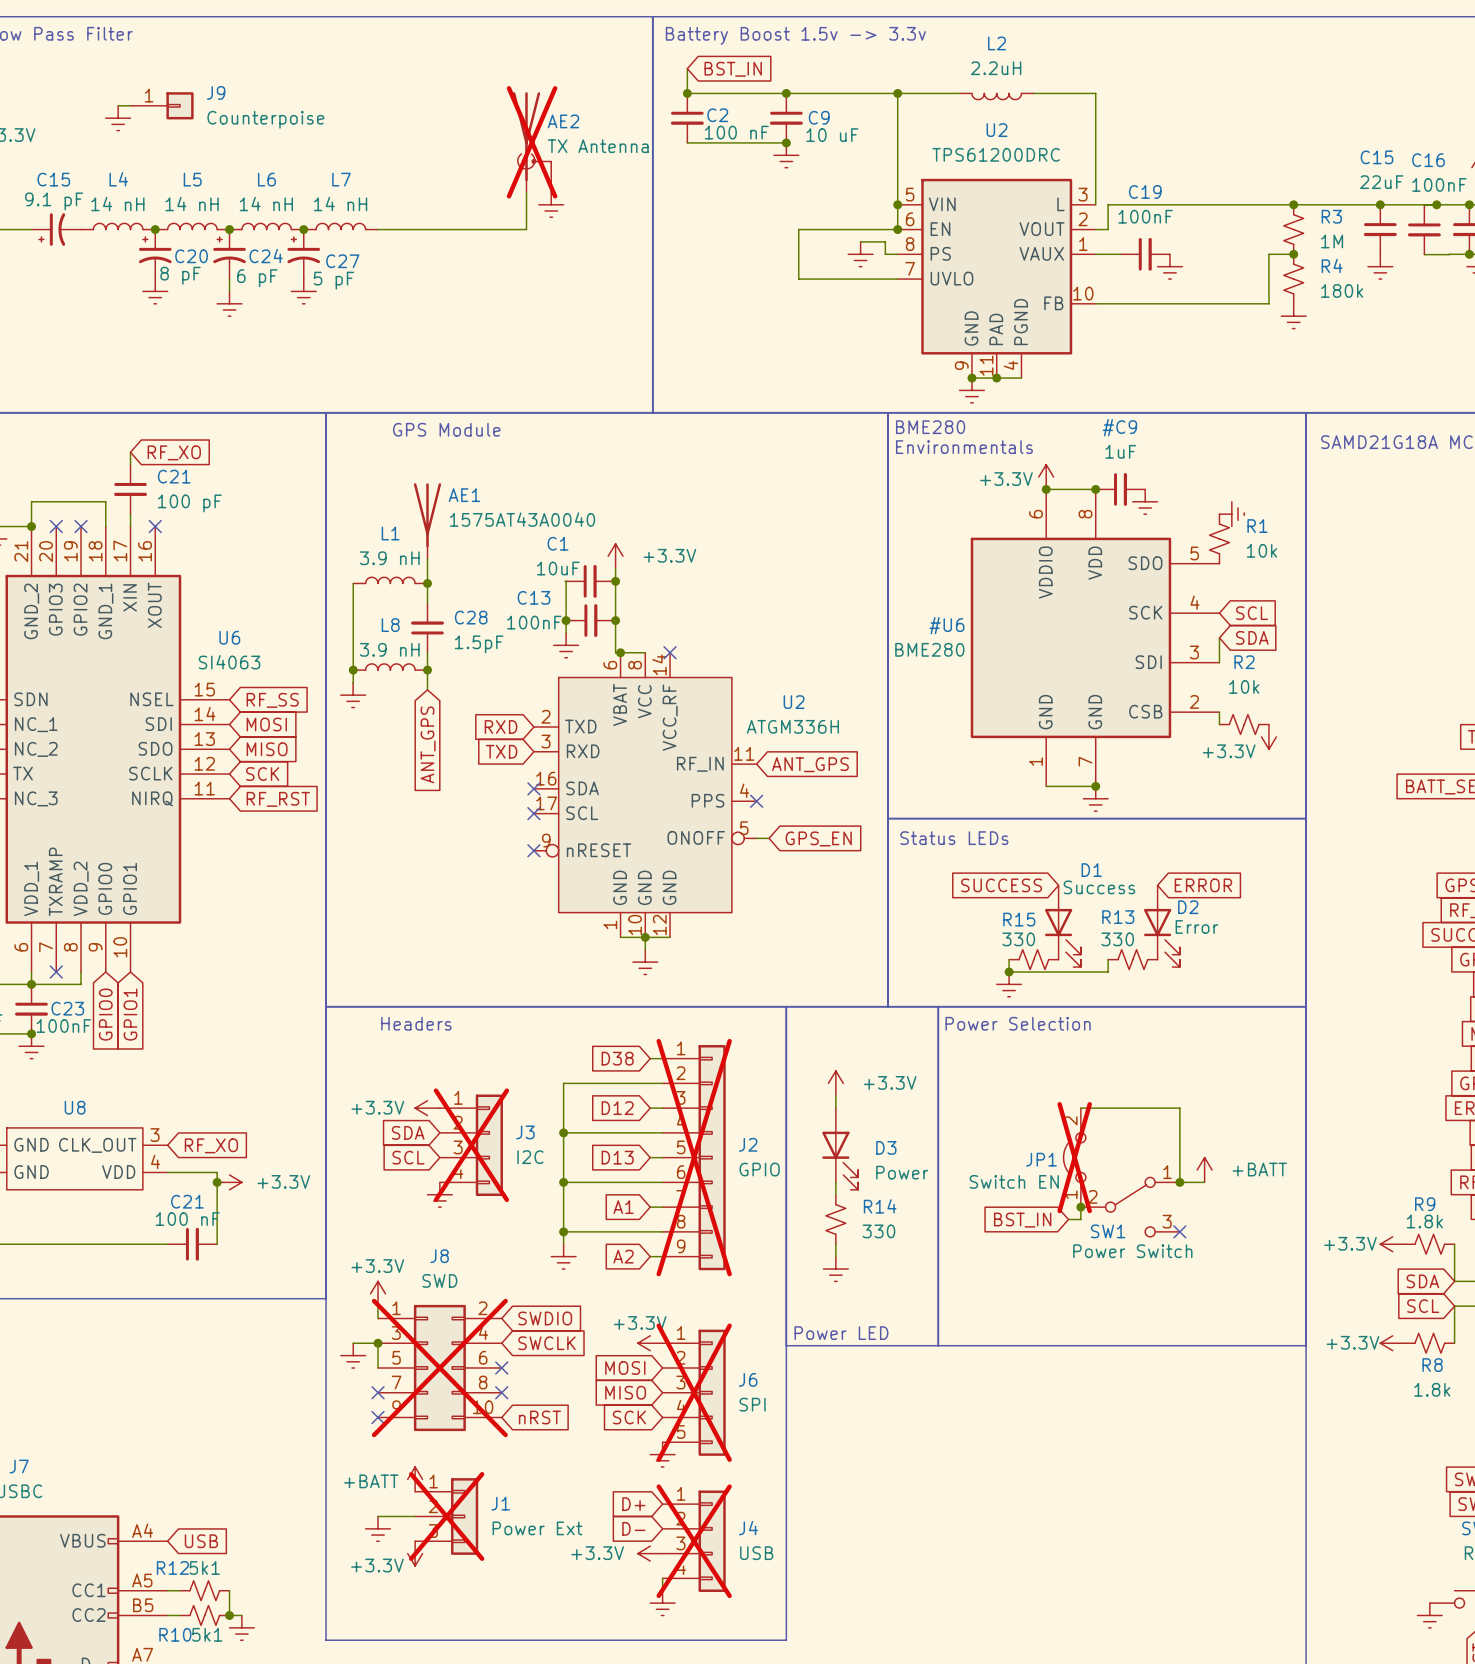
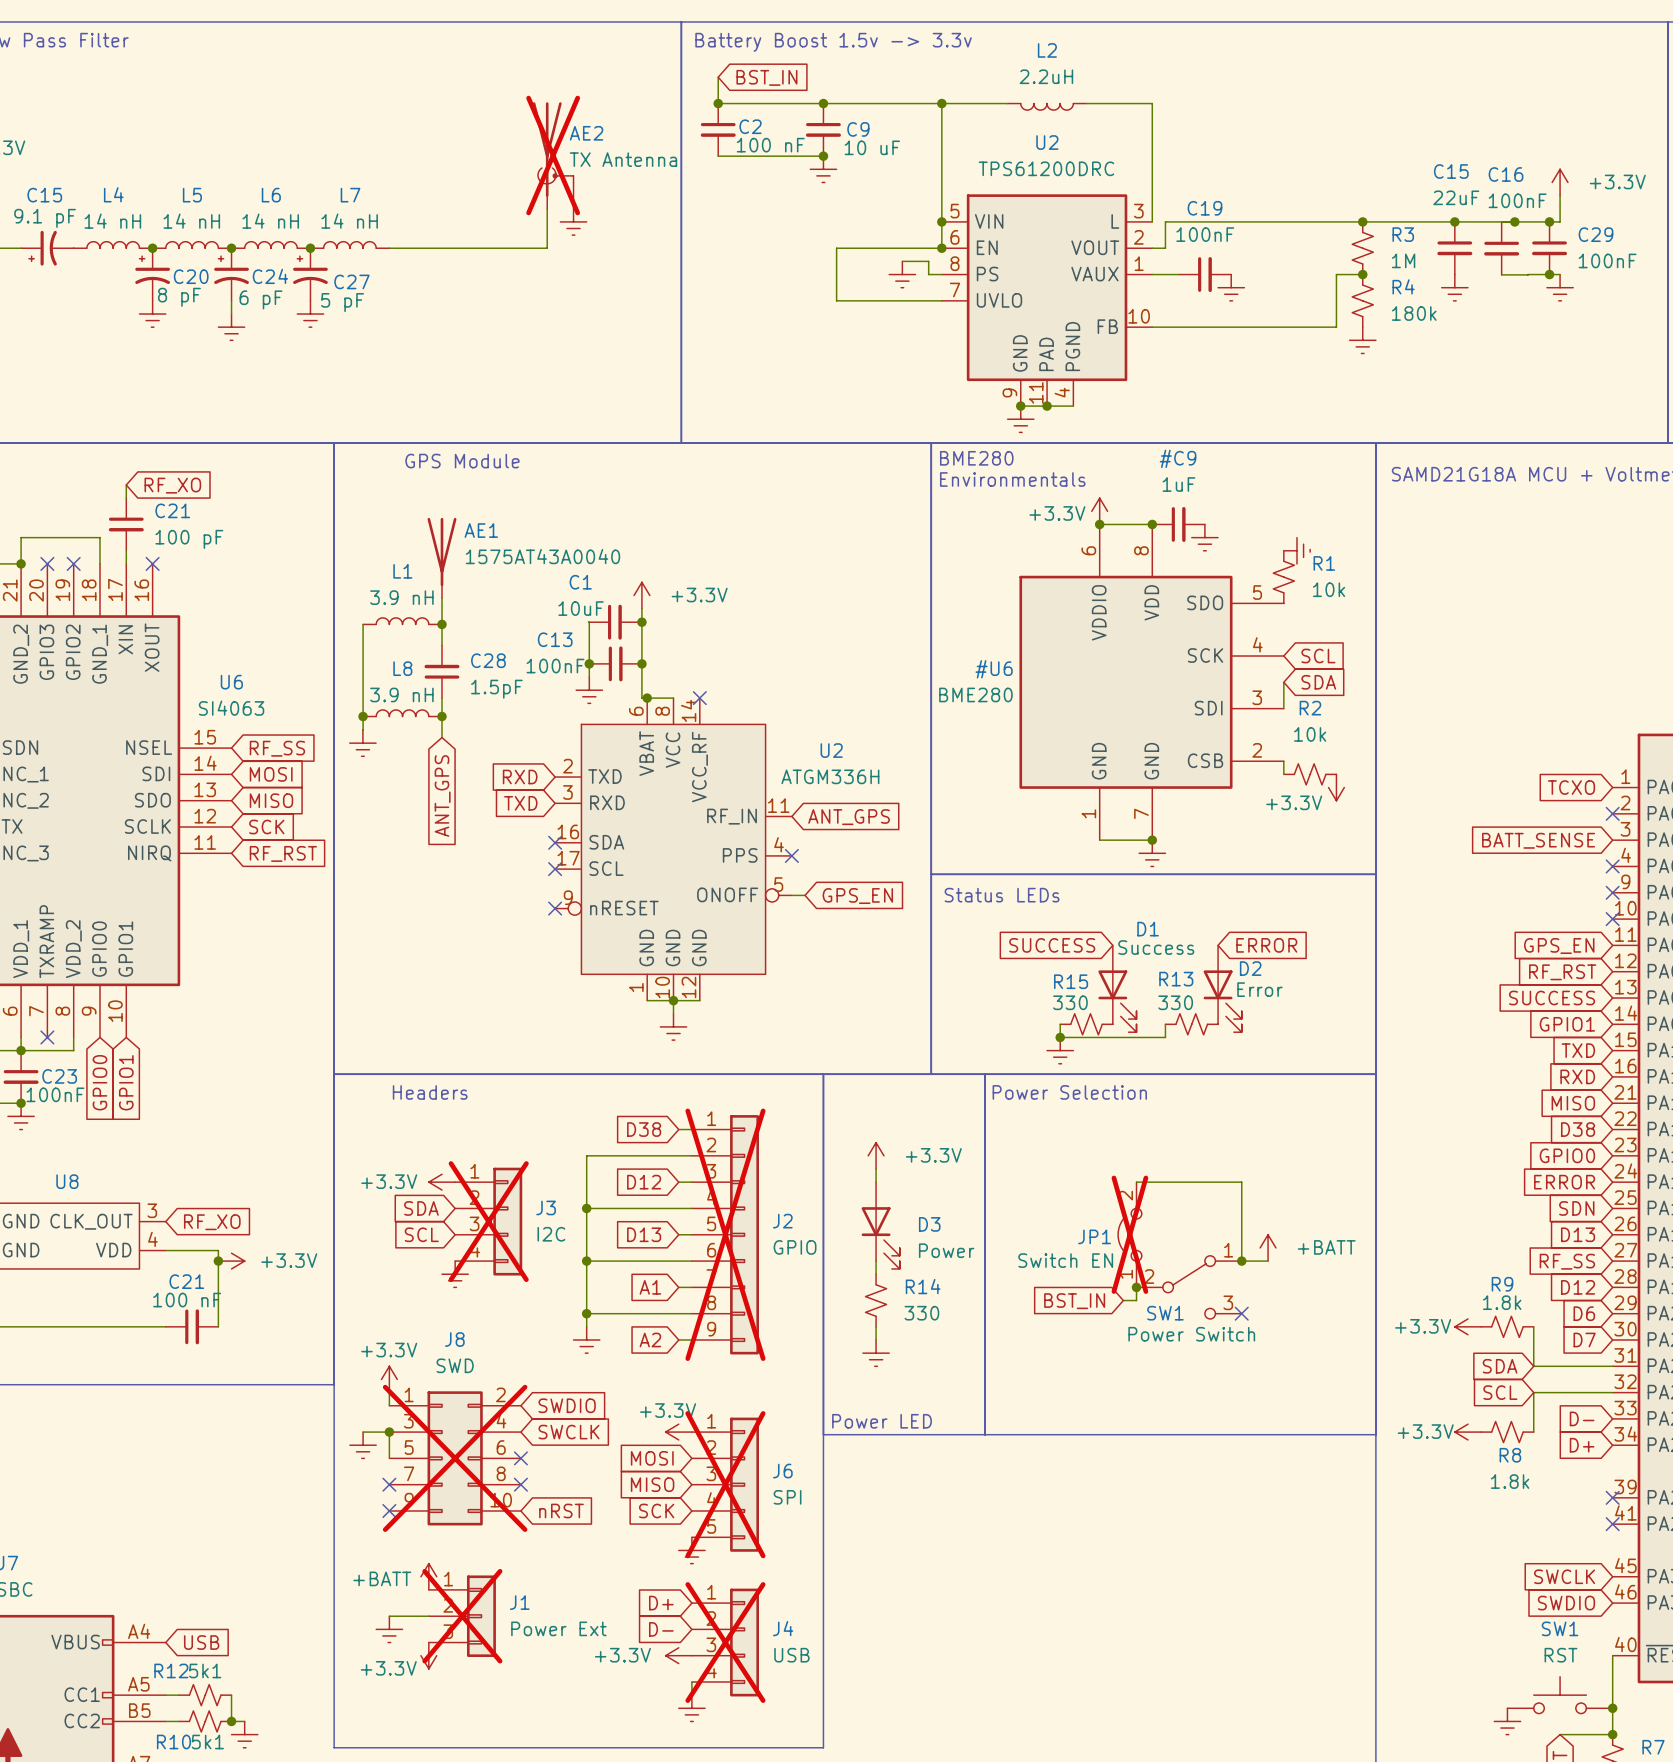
wire: (118, 105) (130, 105) -> none
J9: Counterpoise (162, 105) -> none
power symbol: (118, 118) -> none

